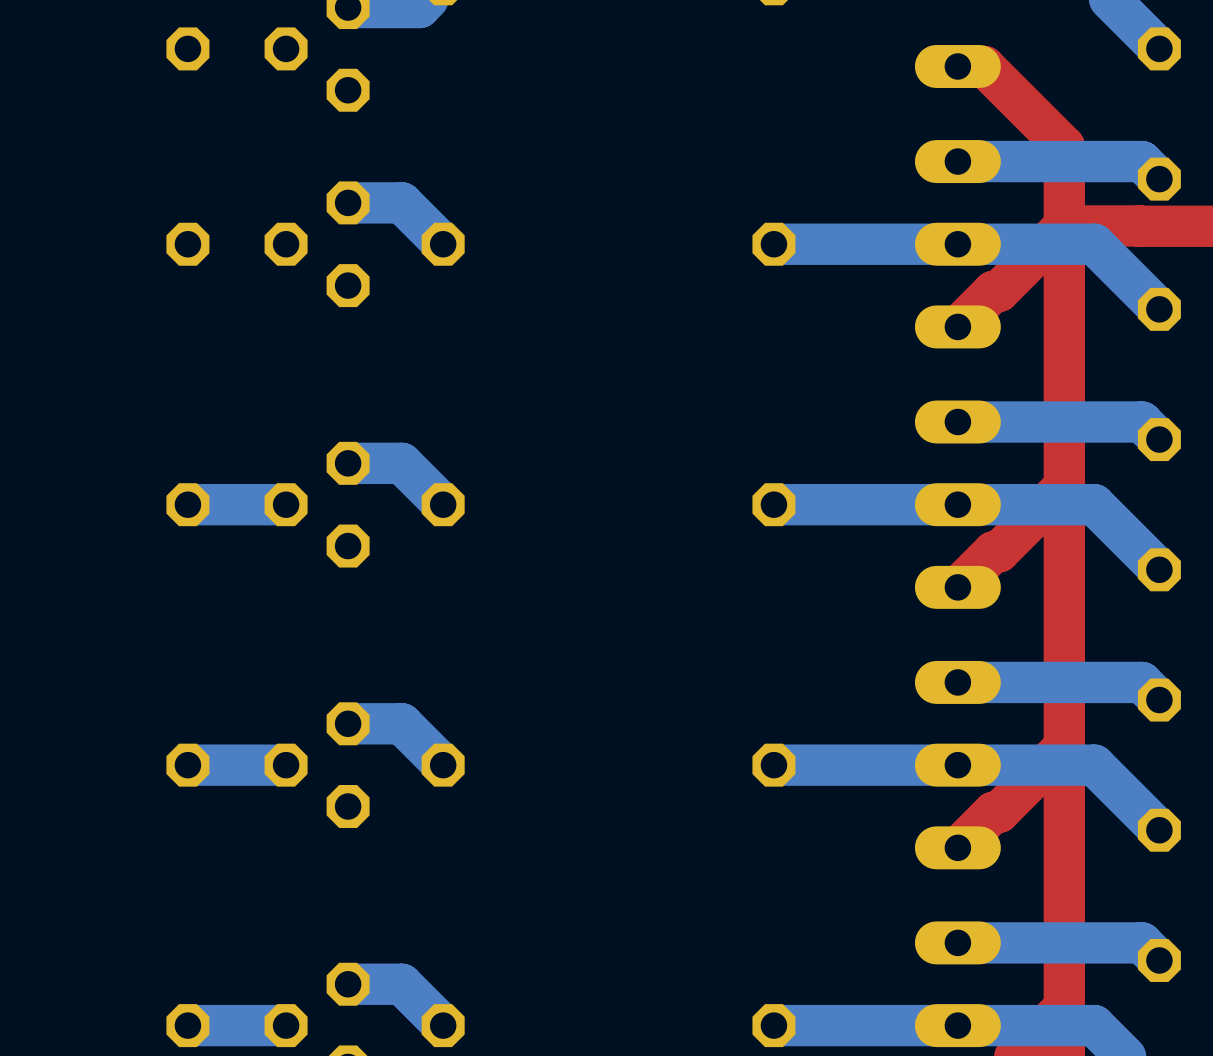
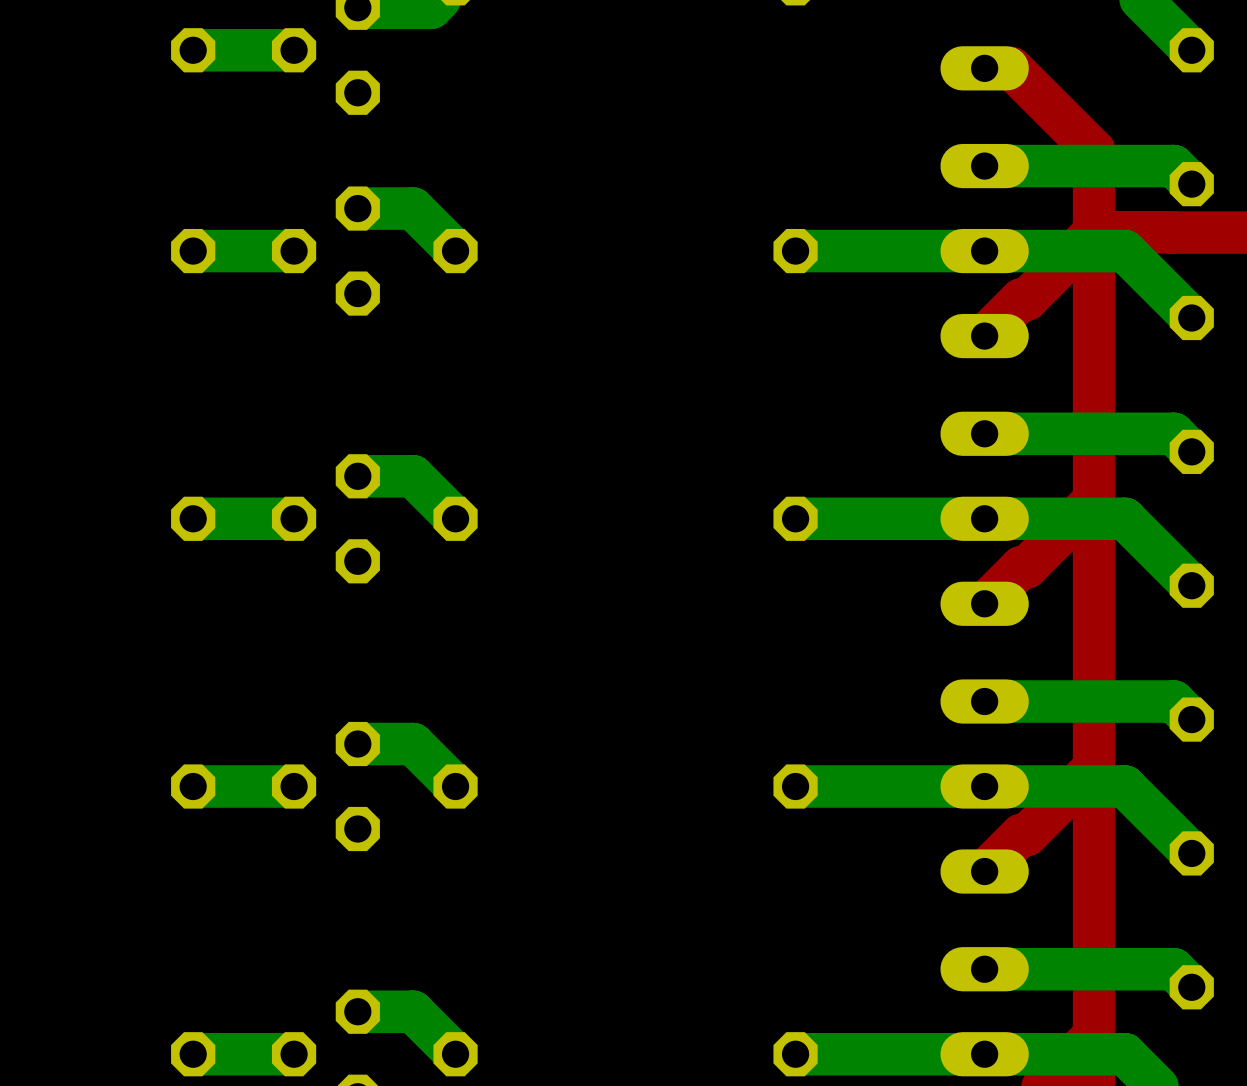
bottom track: none -> (294, 50) (193, 50)
bottom track: none -> (294, 251) (193, 251)

